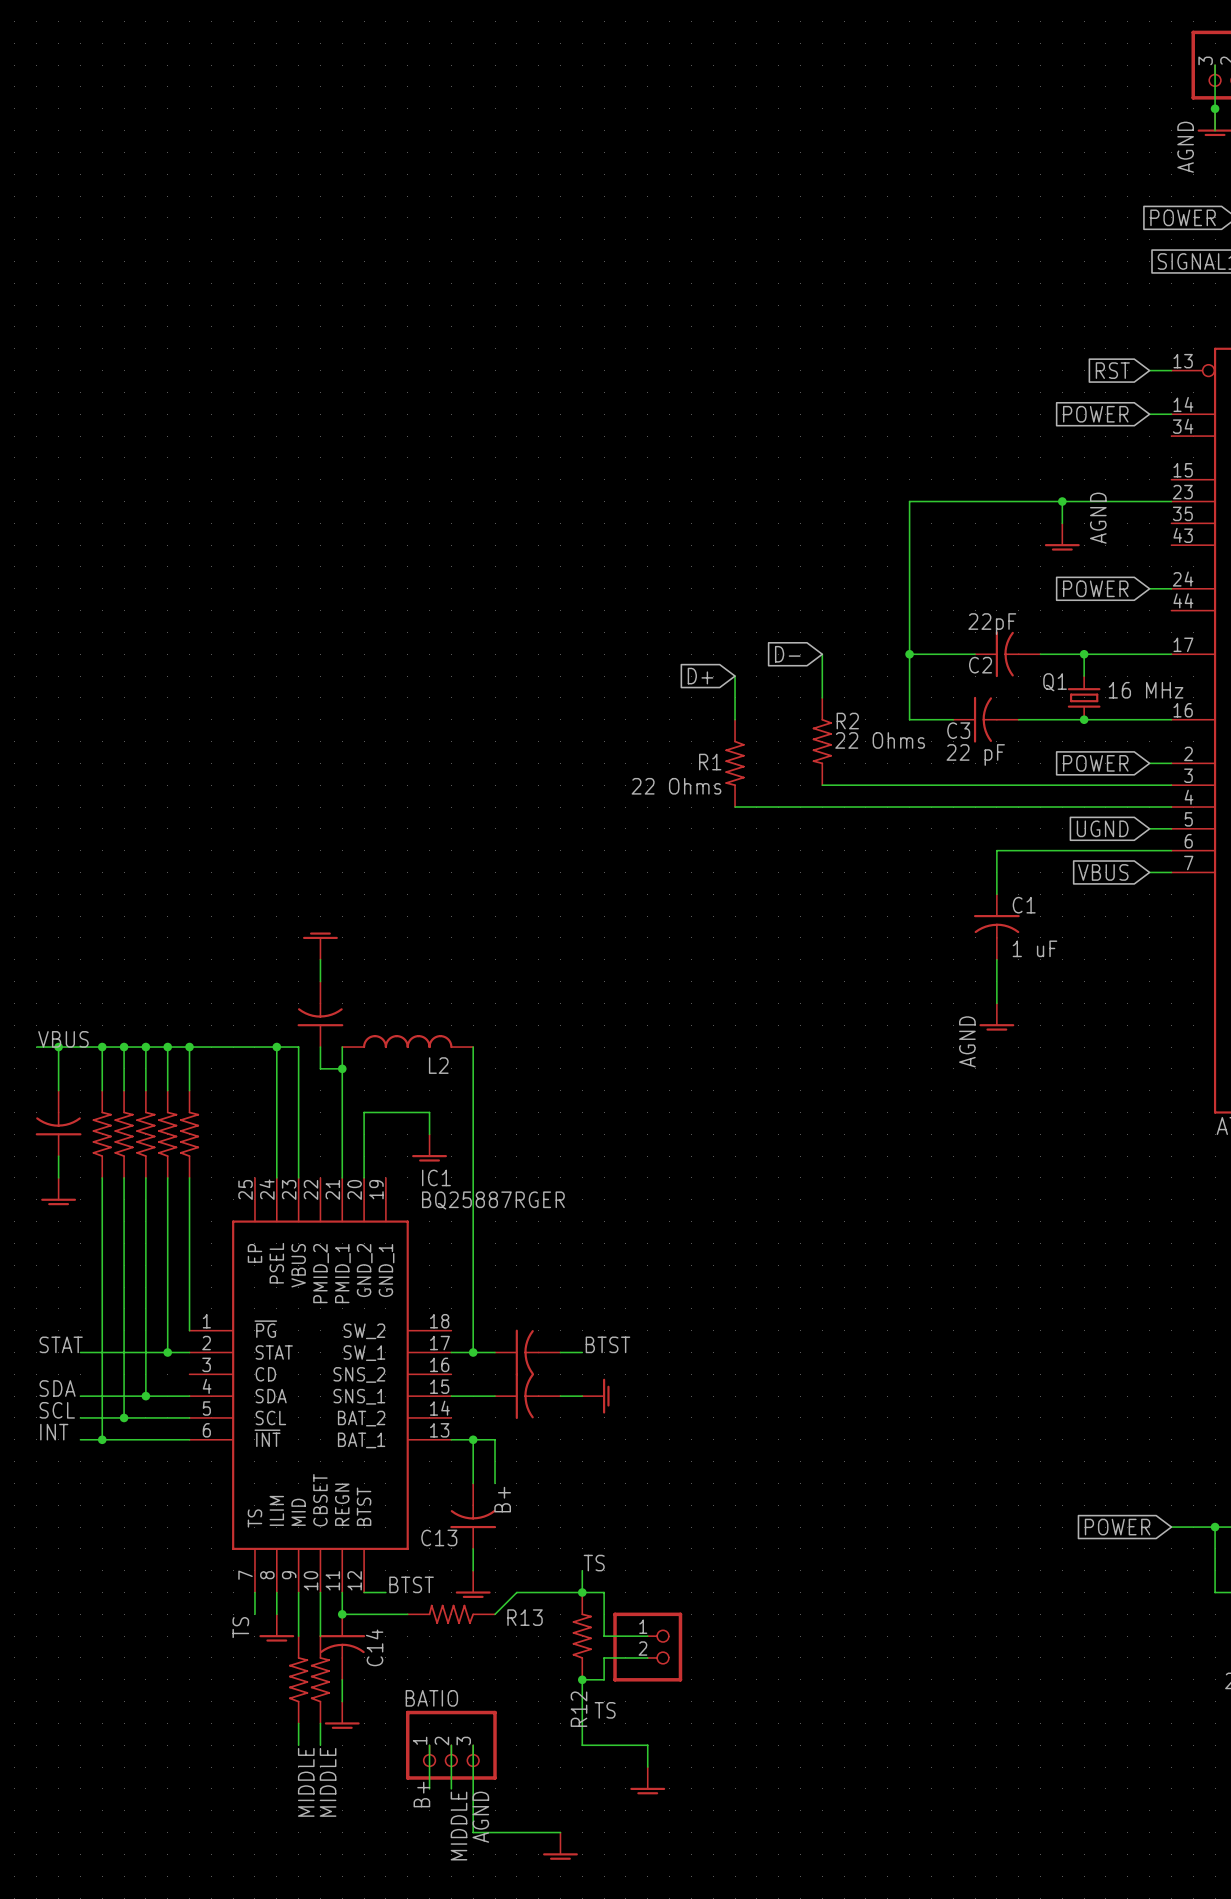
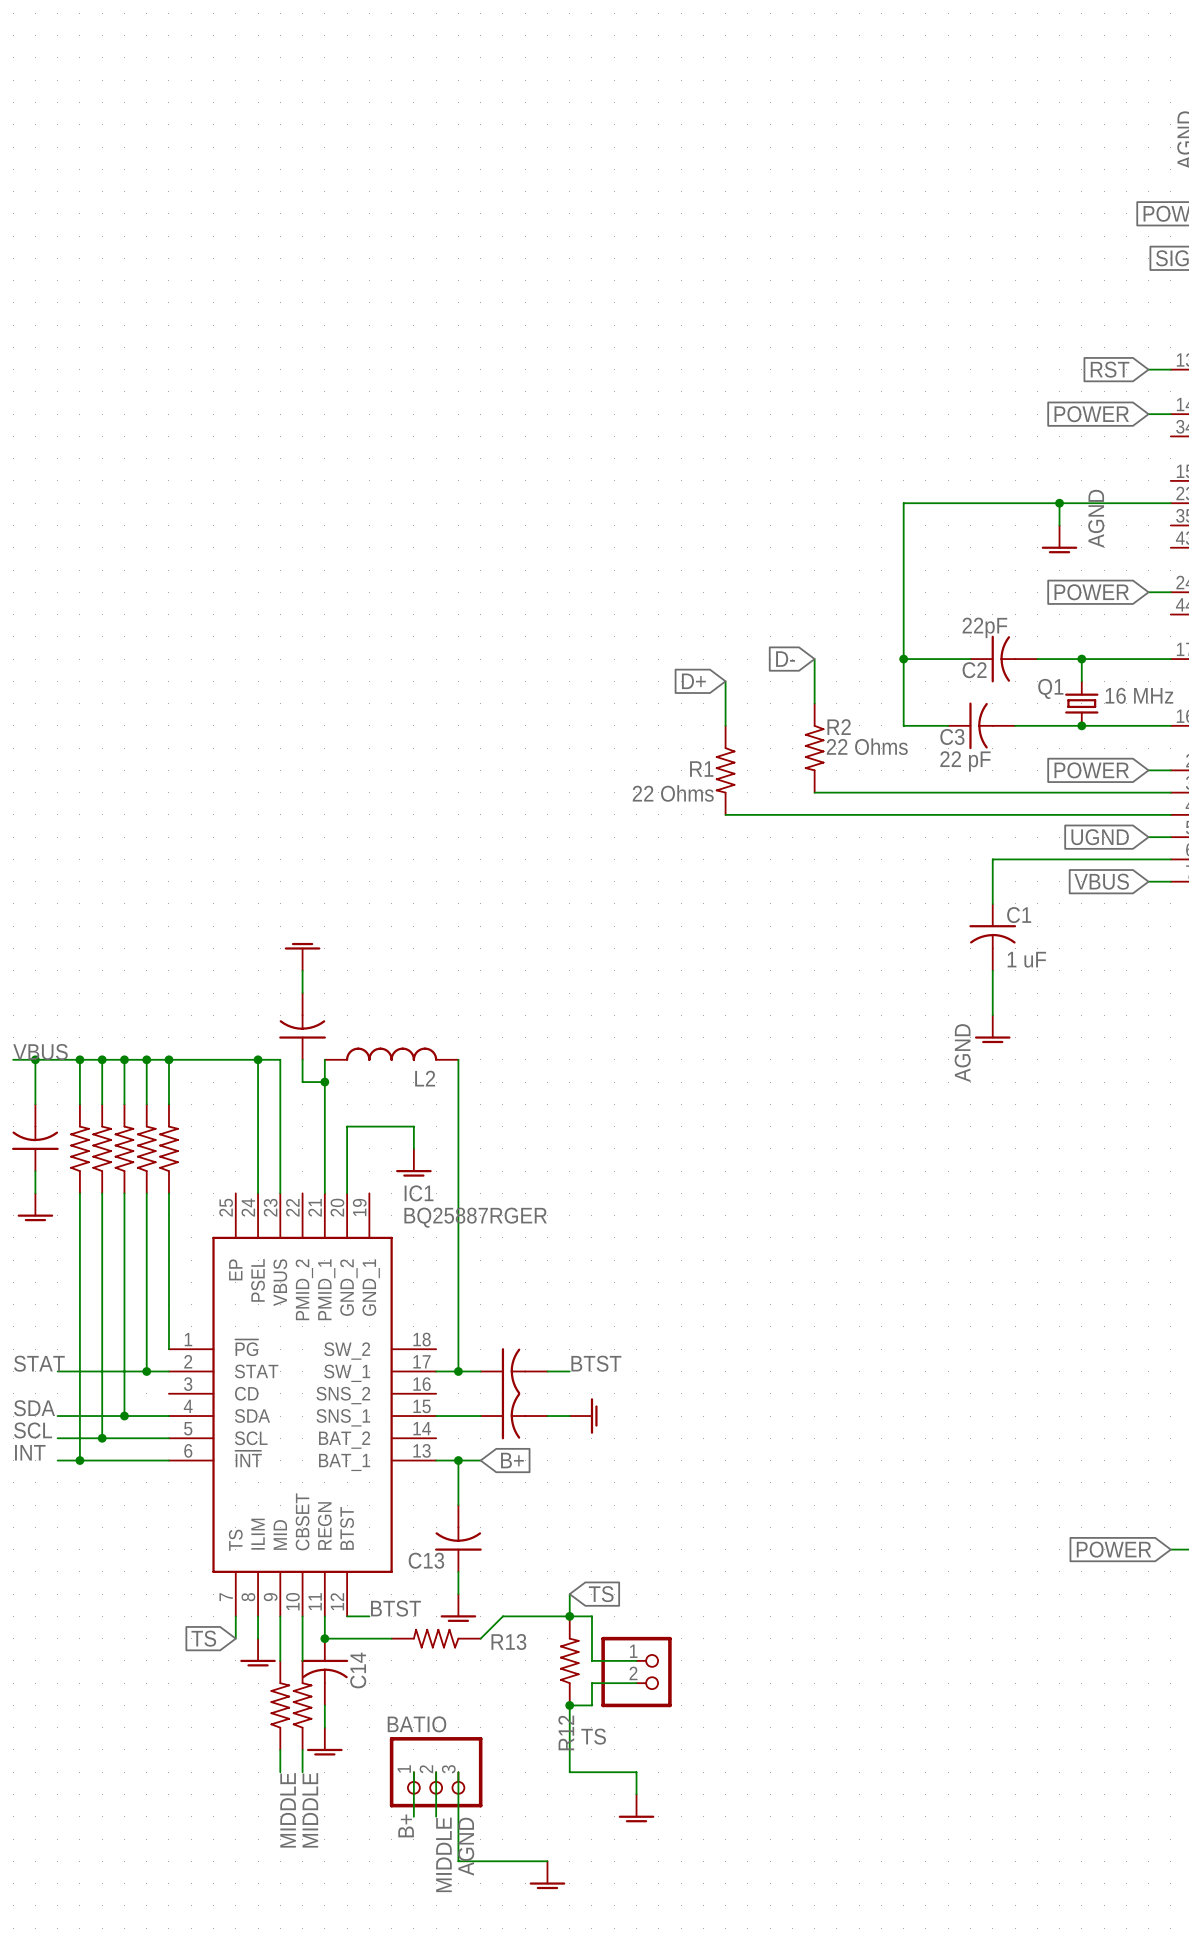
wire: (495, 1439) (495, 1483) -> none
global label: none -> B+ (512, 1460)
label: B+ (502, 1499) -> none
label: TS (594, 1563) -> none
global label: none -> TS (601, 1594)
global label: none -> TS (203, 1638)
label: TS (240, 1627) -> none

